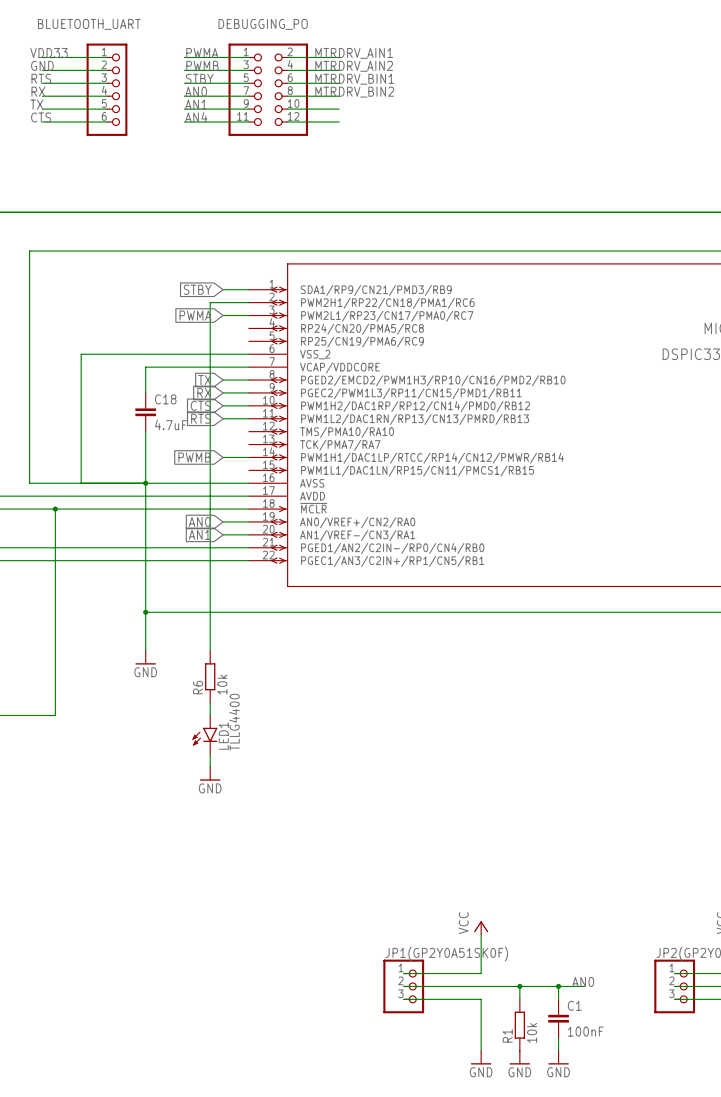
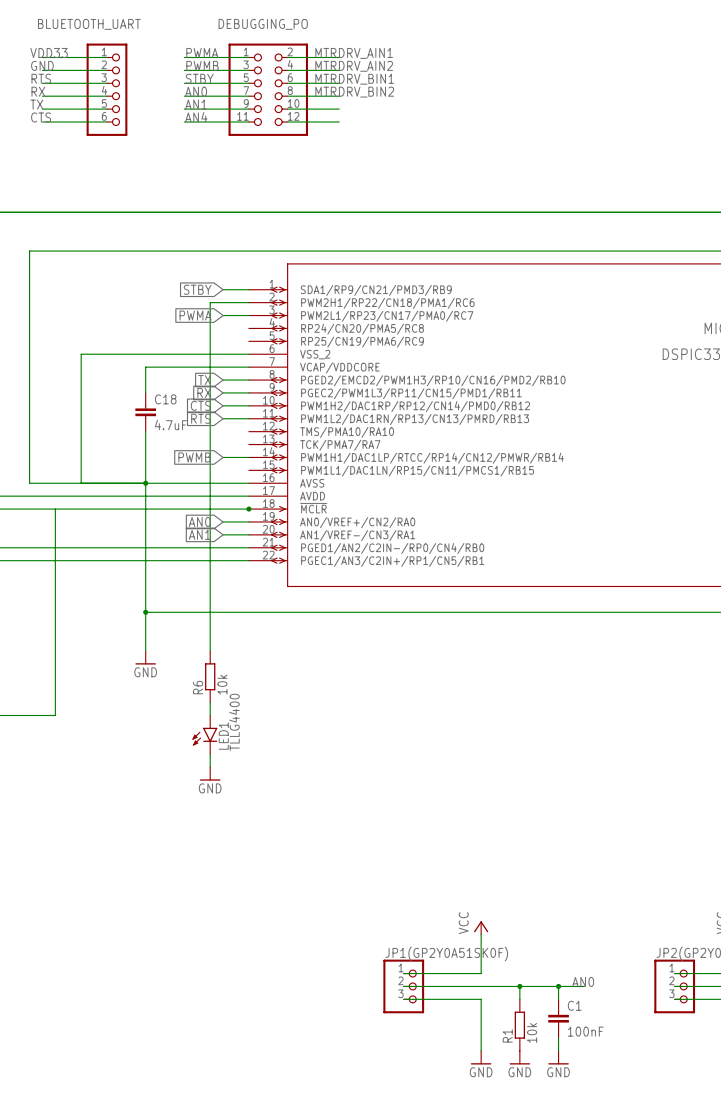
junction: (55, 509) -> none
junction: none -> (248, 509)

